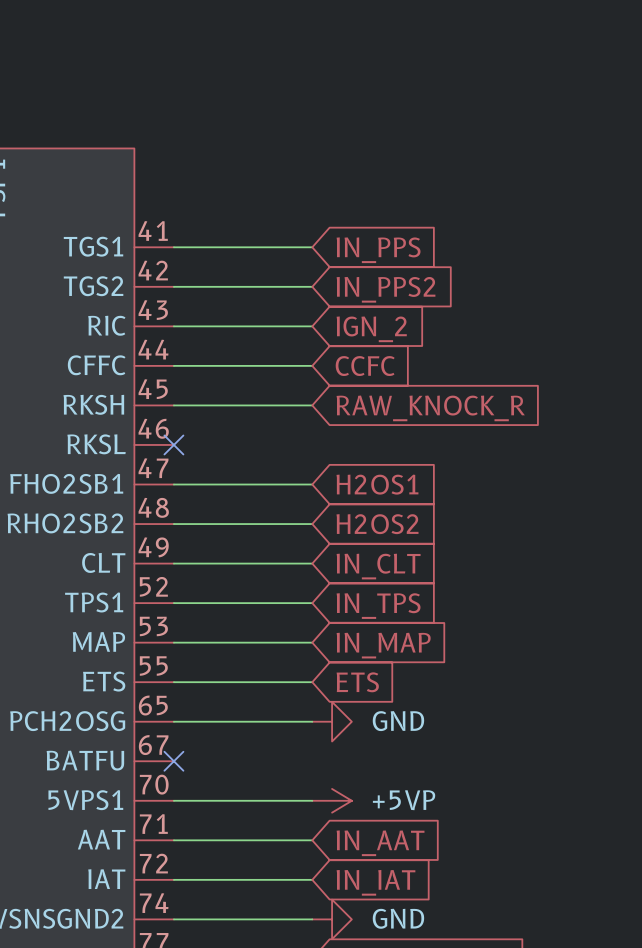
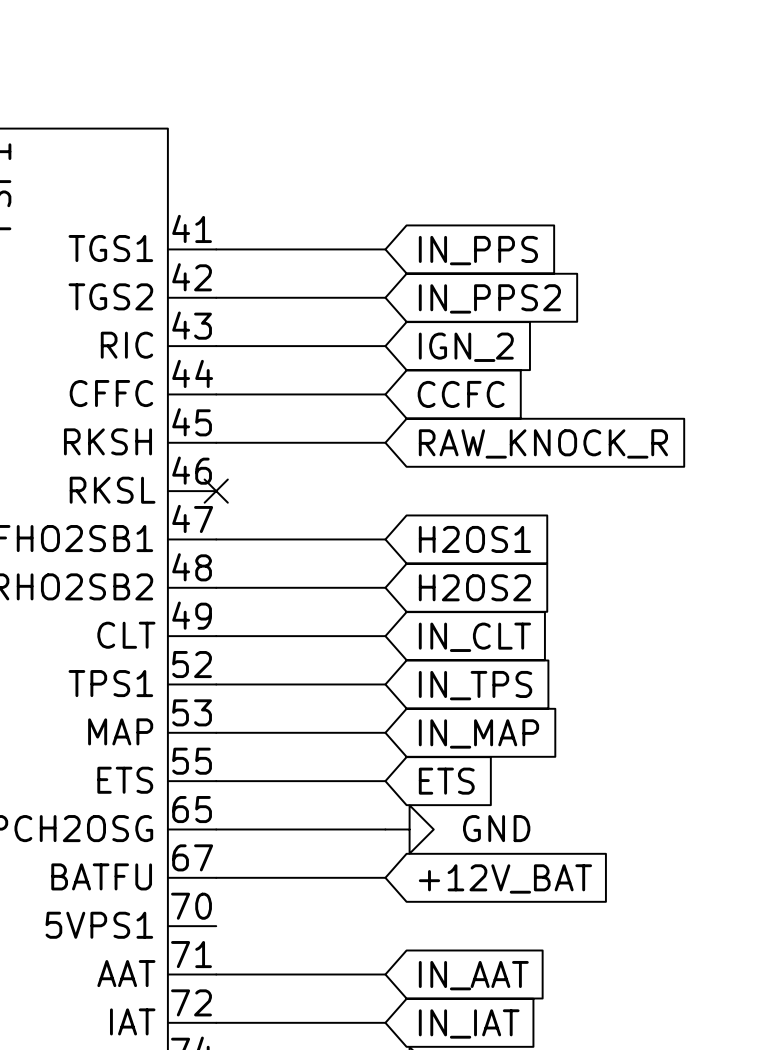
no-connect mark: (173, 761) -> none
global label: none -> +12V_BAT (505, 878)
wire: (173, 800) (312, 800) -> (216, 877) (385, 877)
power symbol: +5VP (332, 800) -> none

